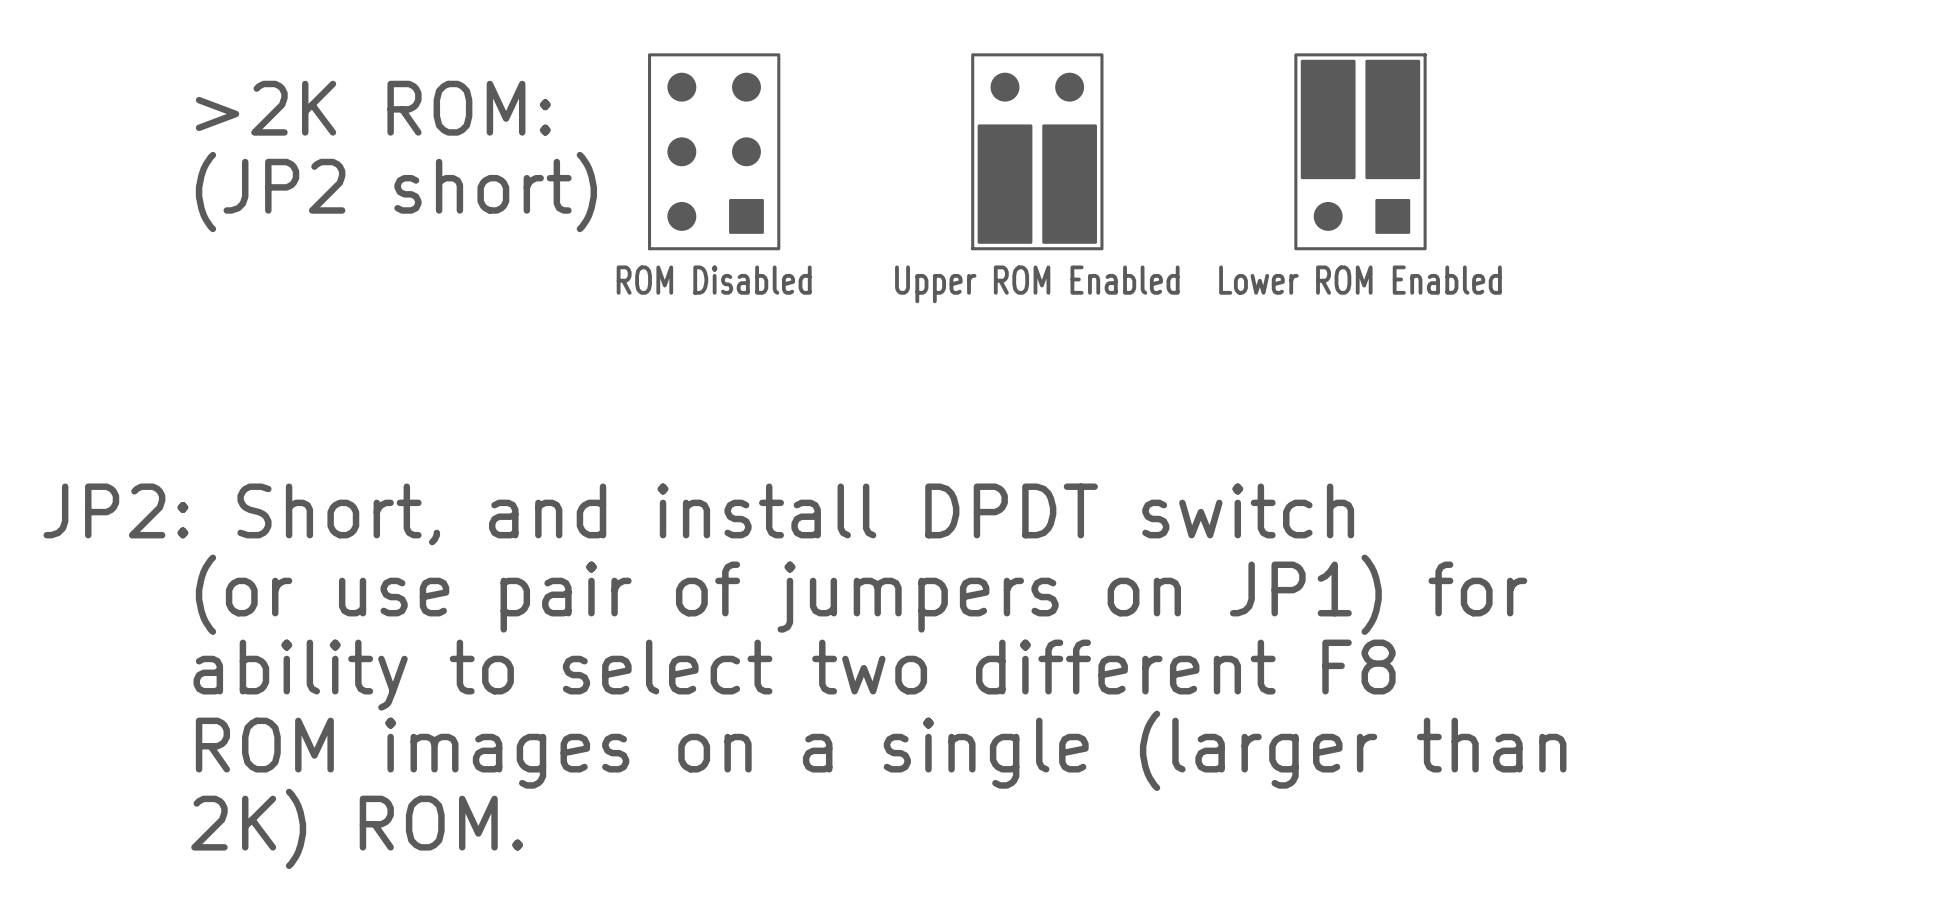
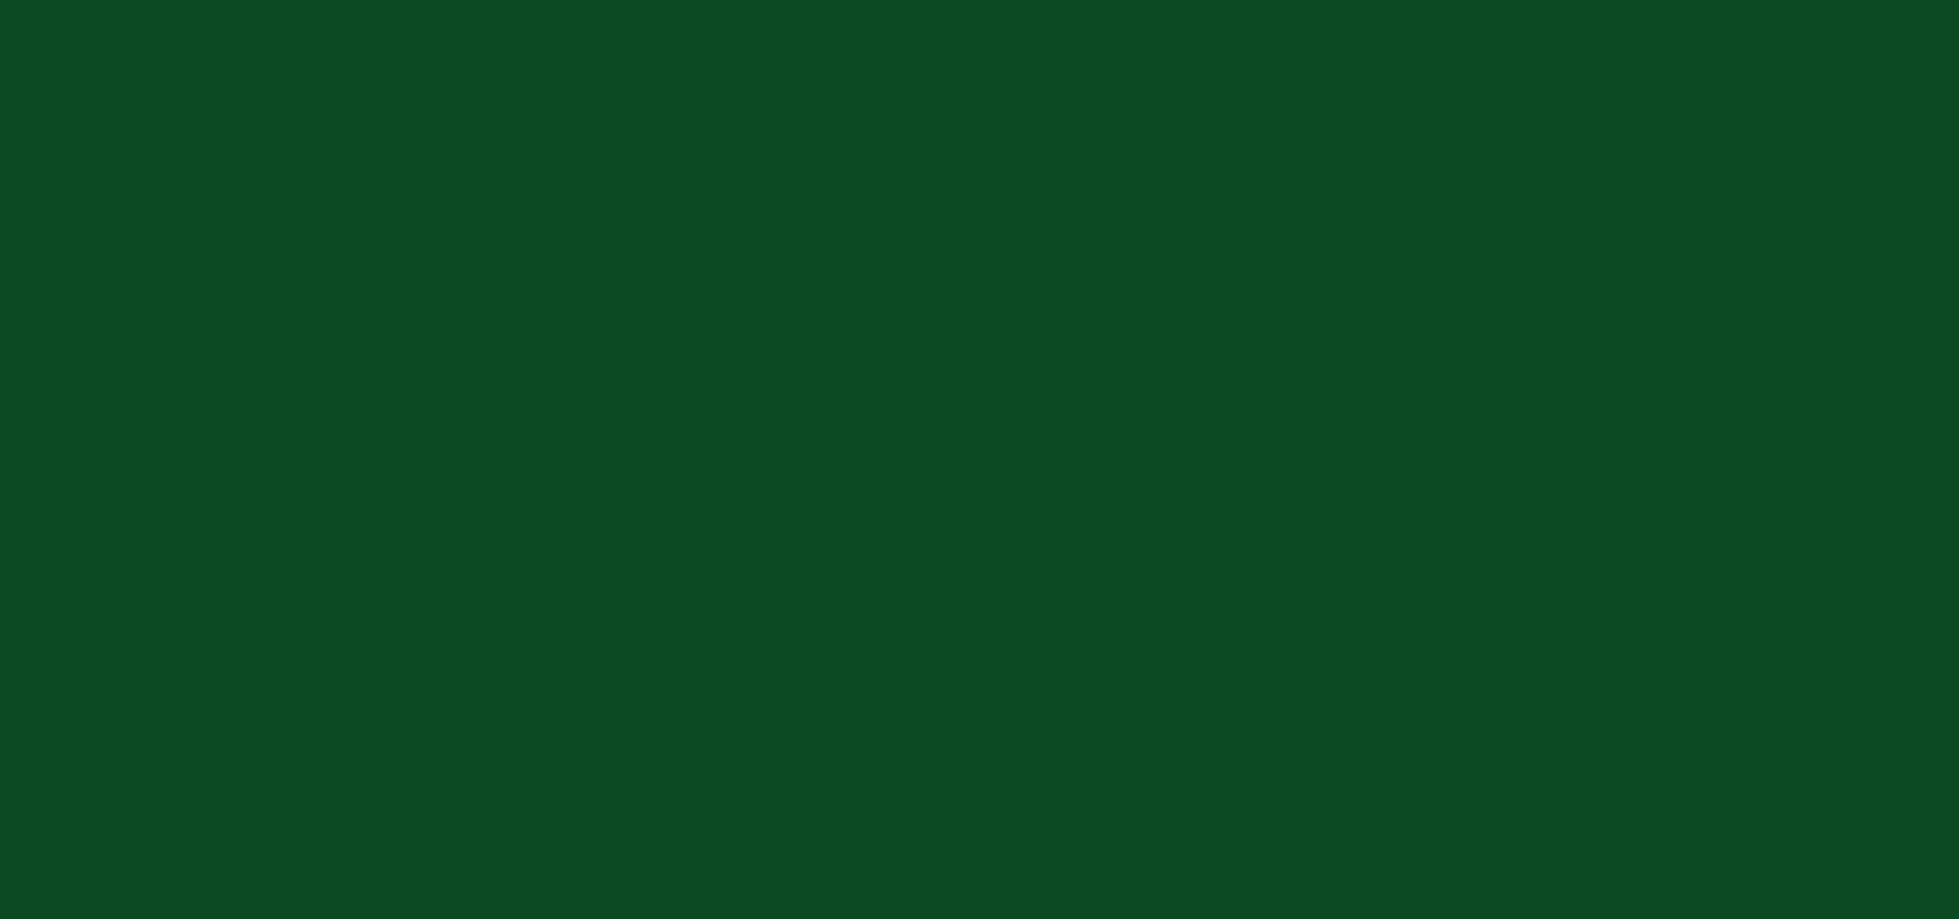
drawing: [648, 53, 781, 251] -> none
drawing: [971, 53, 1427, 251] -> none
text: >2K ROM: (373, 108) -> none
text: (JP2 short) (396, 192) -> none
text: JP2: Short, and install DPDT switch (698, 514) -> none
text: (or use pair of jumpers on JP1) for (861, 594) -> none
text: ability to select two different F8 (794, 675) -> none
text: ROM images on a single (larger than (881, 750) -> none
text: 2K) ROM. (357, 828) -> none

